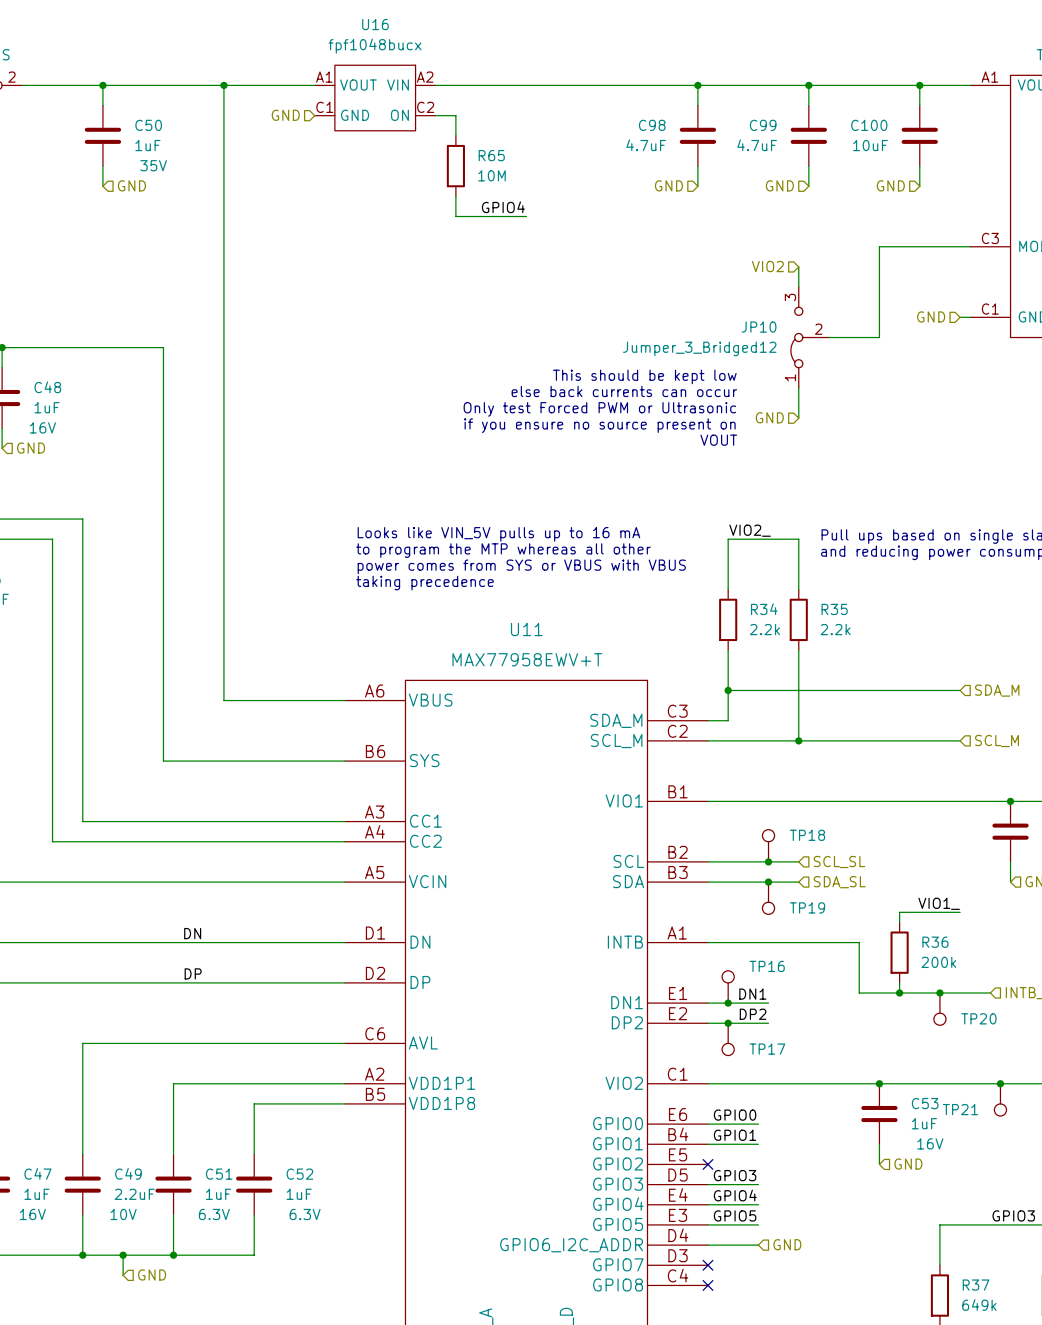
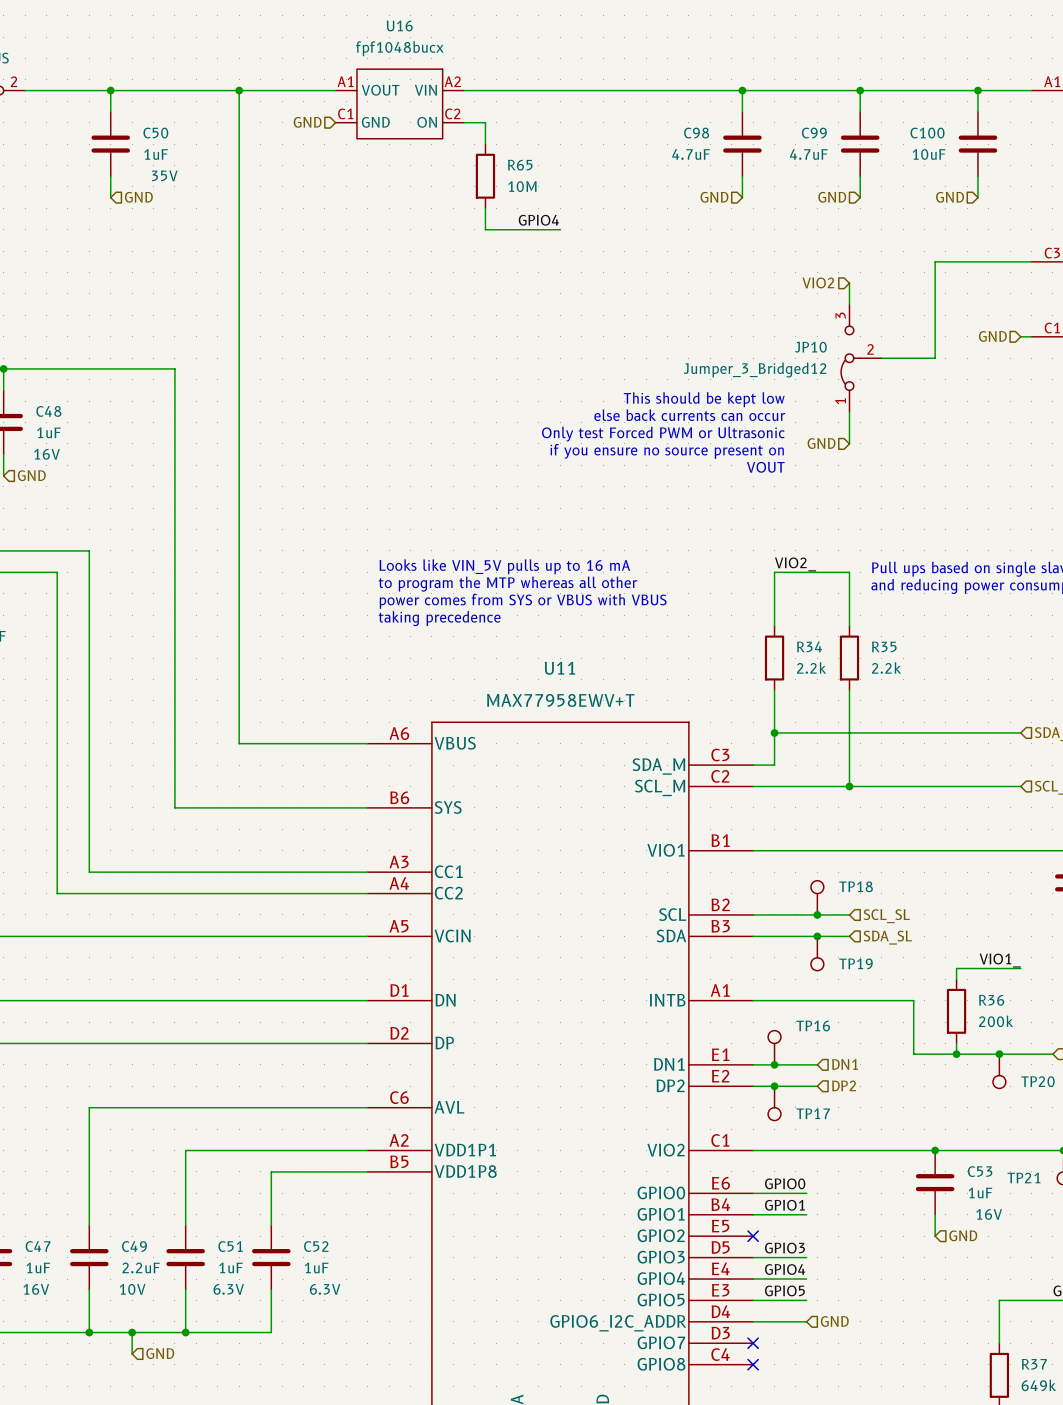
label: DN (192, 933) -> none
label: DP (193, 973) -> none
label: DN1 (752, 994) -> none
hierarchical label: none -> DN1 (845, 1064)
label: DP2 (753, 1014) -> none
hierarchical label: none -> DP2 (844, 1085)

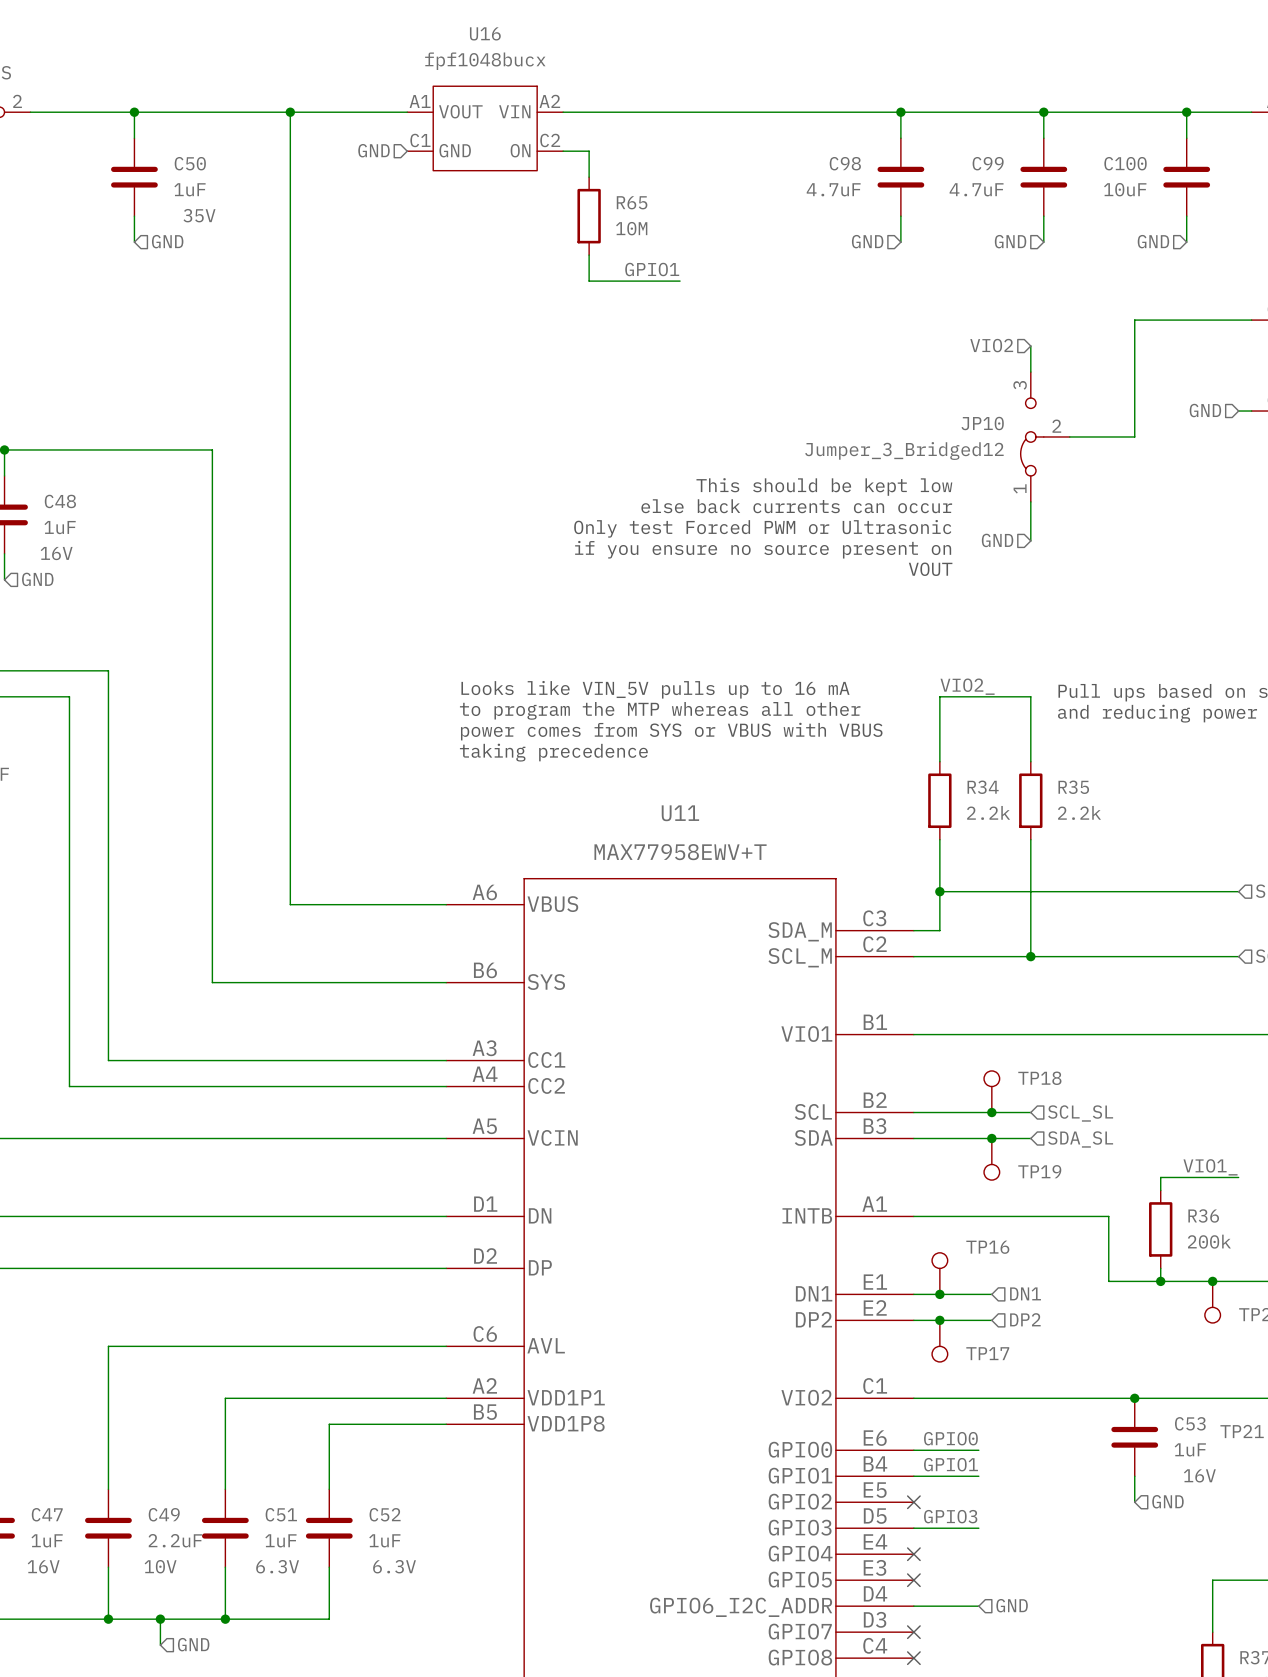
label: GPIO4 (538, 220) -> GPIO1 (652, 269)
label: GPIO4 (785, 1269) -> none
wire: (753, 1279) (806, 1279) -> none
no-connect mark: none -> (913, 1554)
label: GPIO5 (784, 1290) -> none
wire: (753, 1300) (806, 1300) -> none
no-connect mark: none -> (913, 1580)

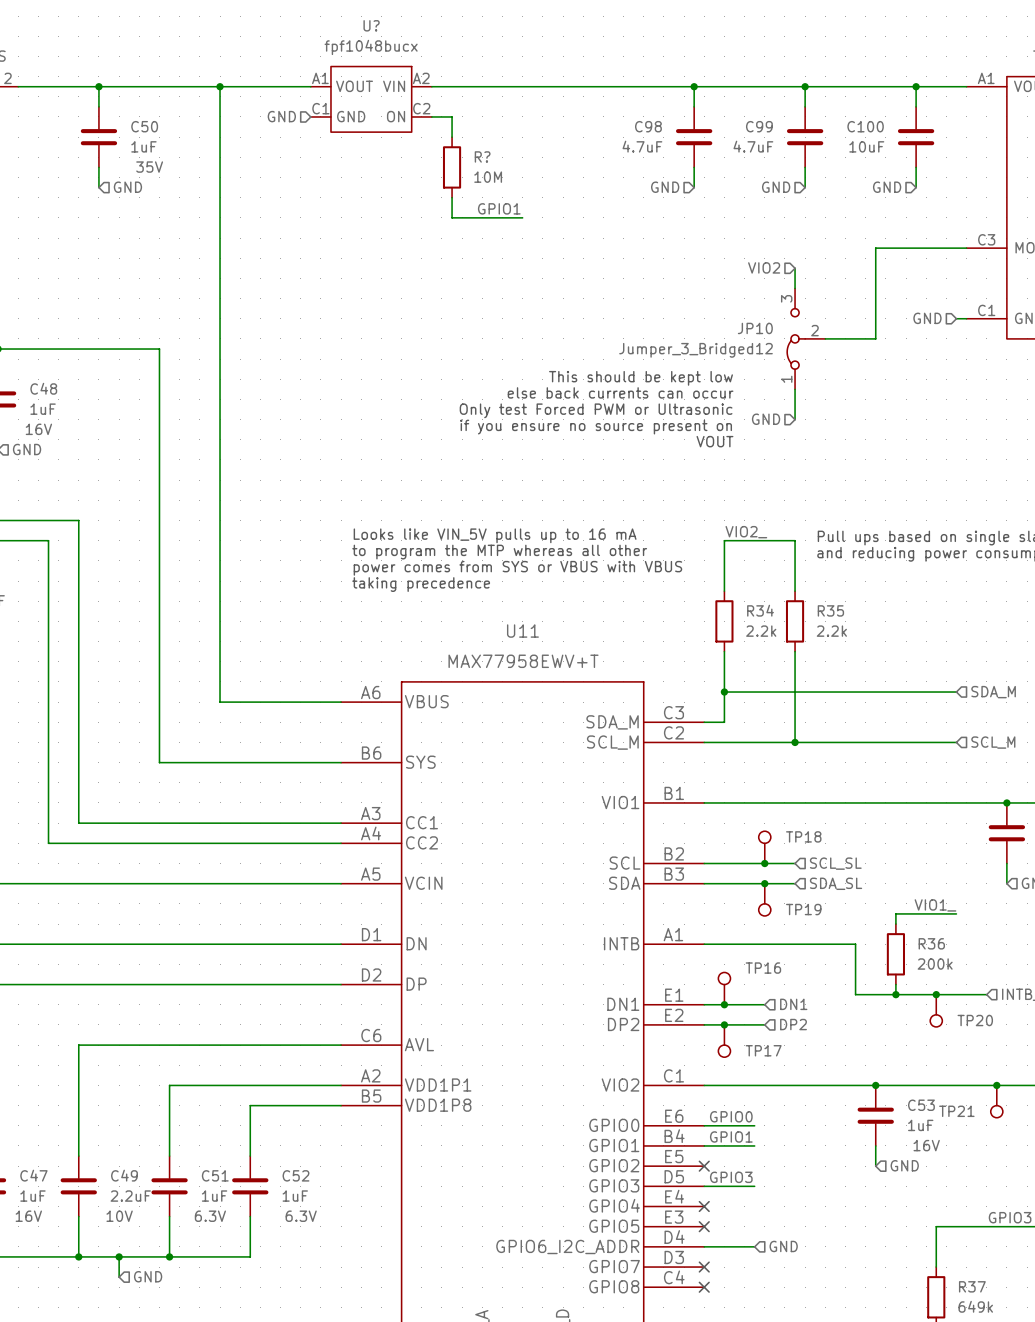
U16 name: U16 (485, 33) -> U? (371, 25)
R65 name: R65 (632, 202) -> R? (482, 156)

